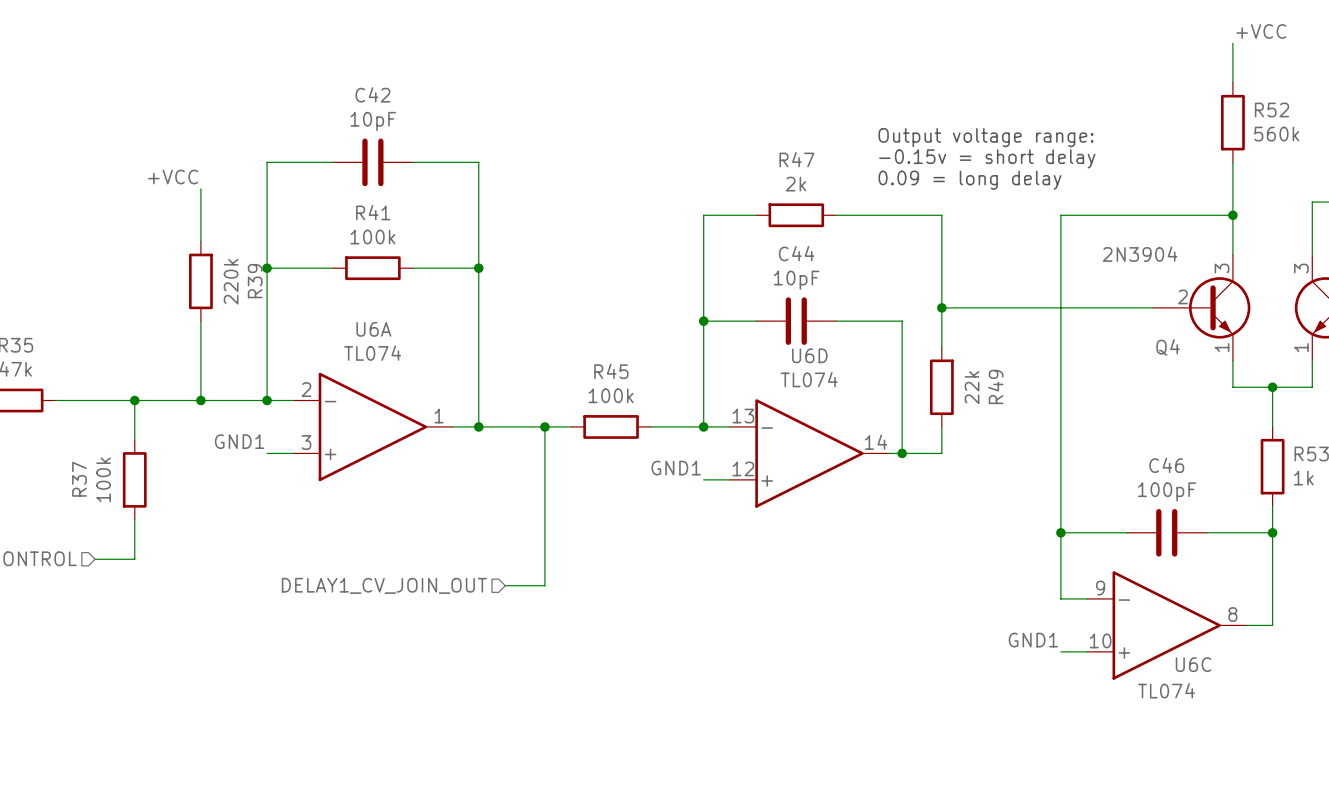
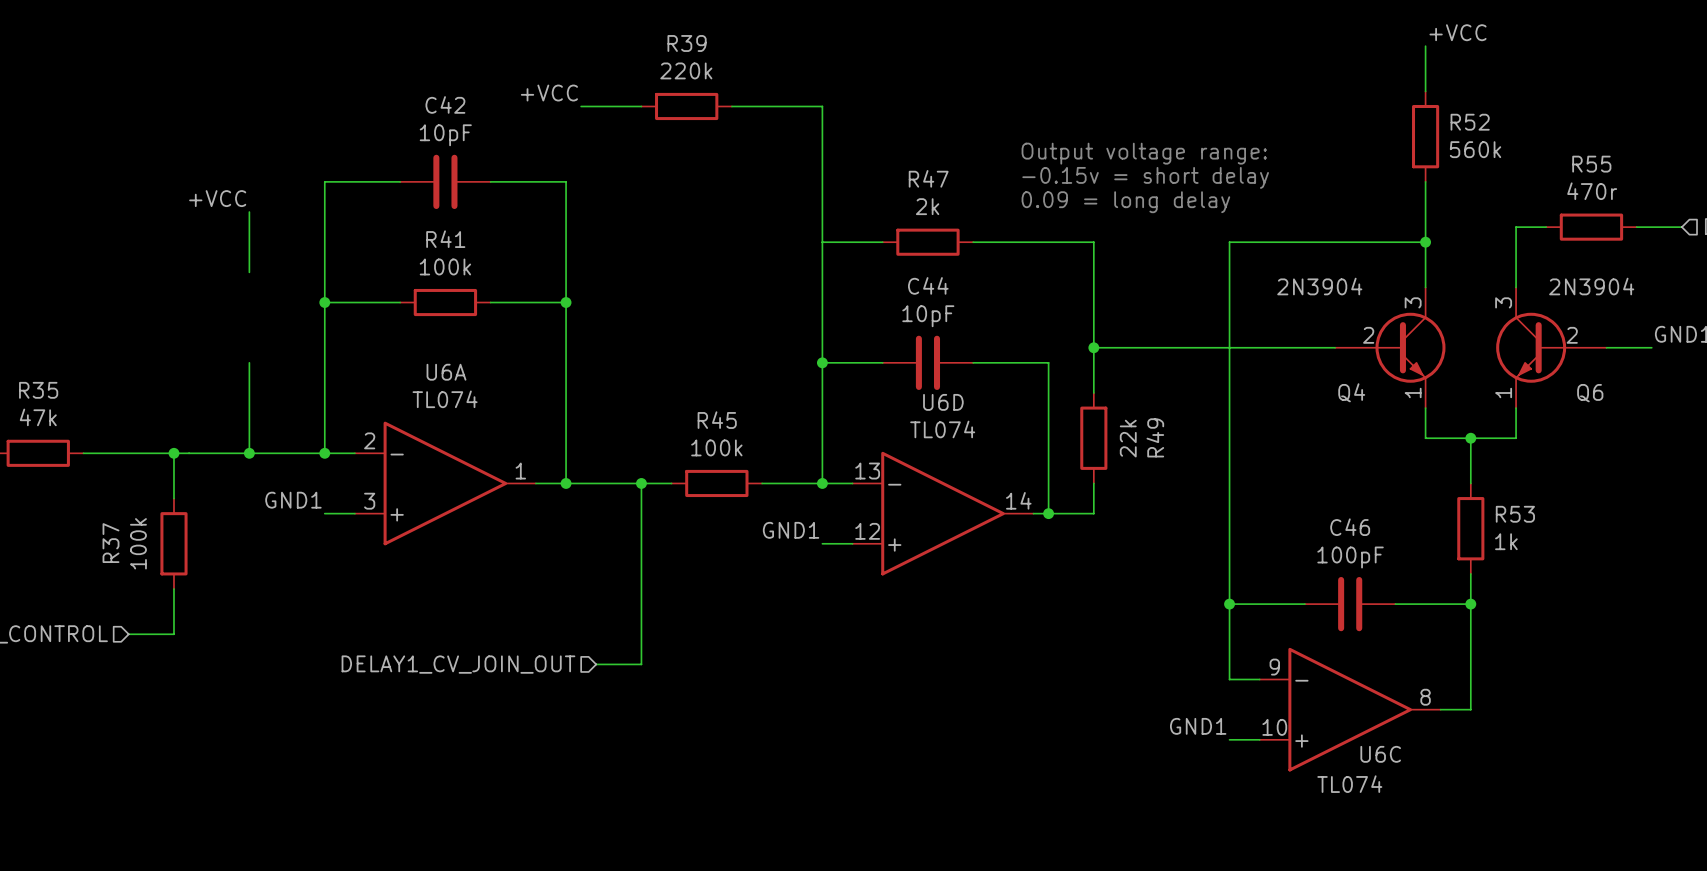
label: none -> +VCC (549, 93)
wire: none -> (581, 106) (641, 106)
wire: none -> (731, 106) (822, 106) (822, 242)
R39 rotation: 0° (200, 281) -> 90° clockwise (686, 106)
R39 position: (200, 281) -> (686, 106)
R39 value position: 220k (231, 281) -> 220k (686, 70)
R39 name position: R39 (255, 281) -> R39 (687, 43)

